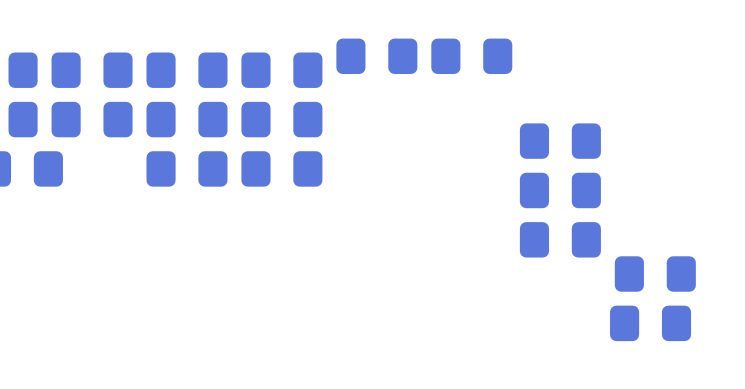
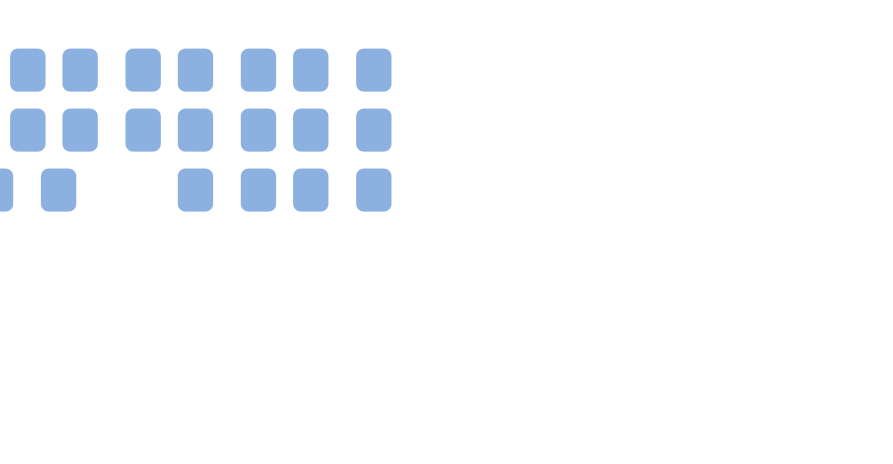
part: (376, 56) -> none
part: (471, 56) -> none
part: (560, 141) -> none
part: (560, 190) -> none
part: (560, 239) -> none
part: (655, 274) -> none
part: (650, 323) -> none

